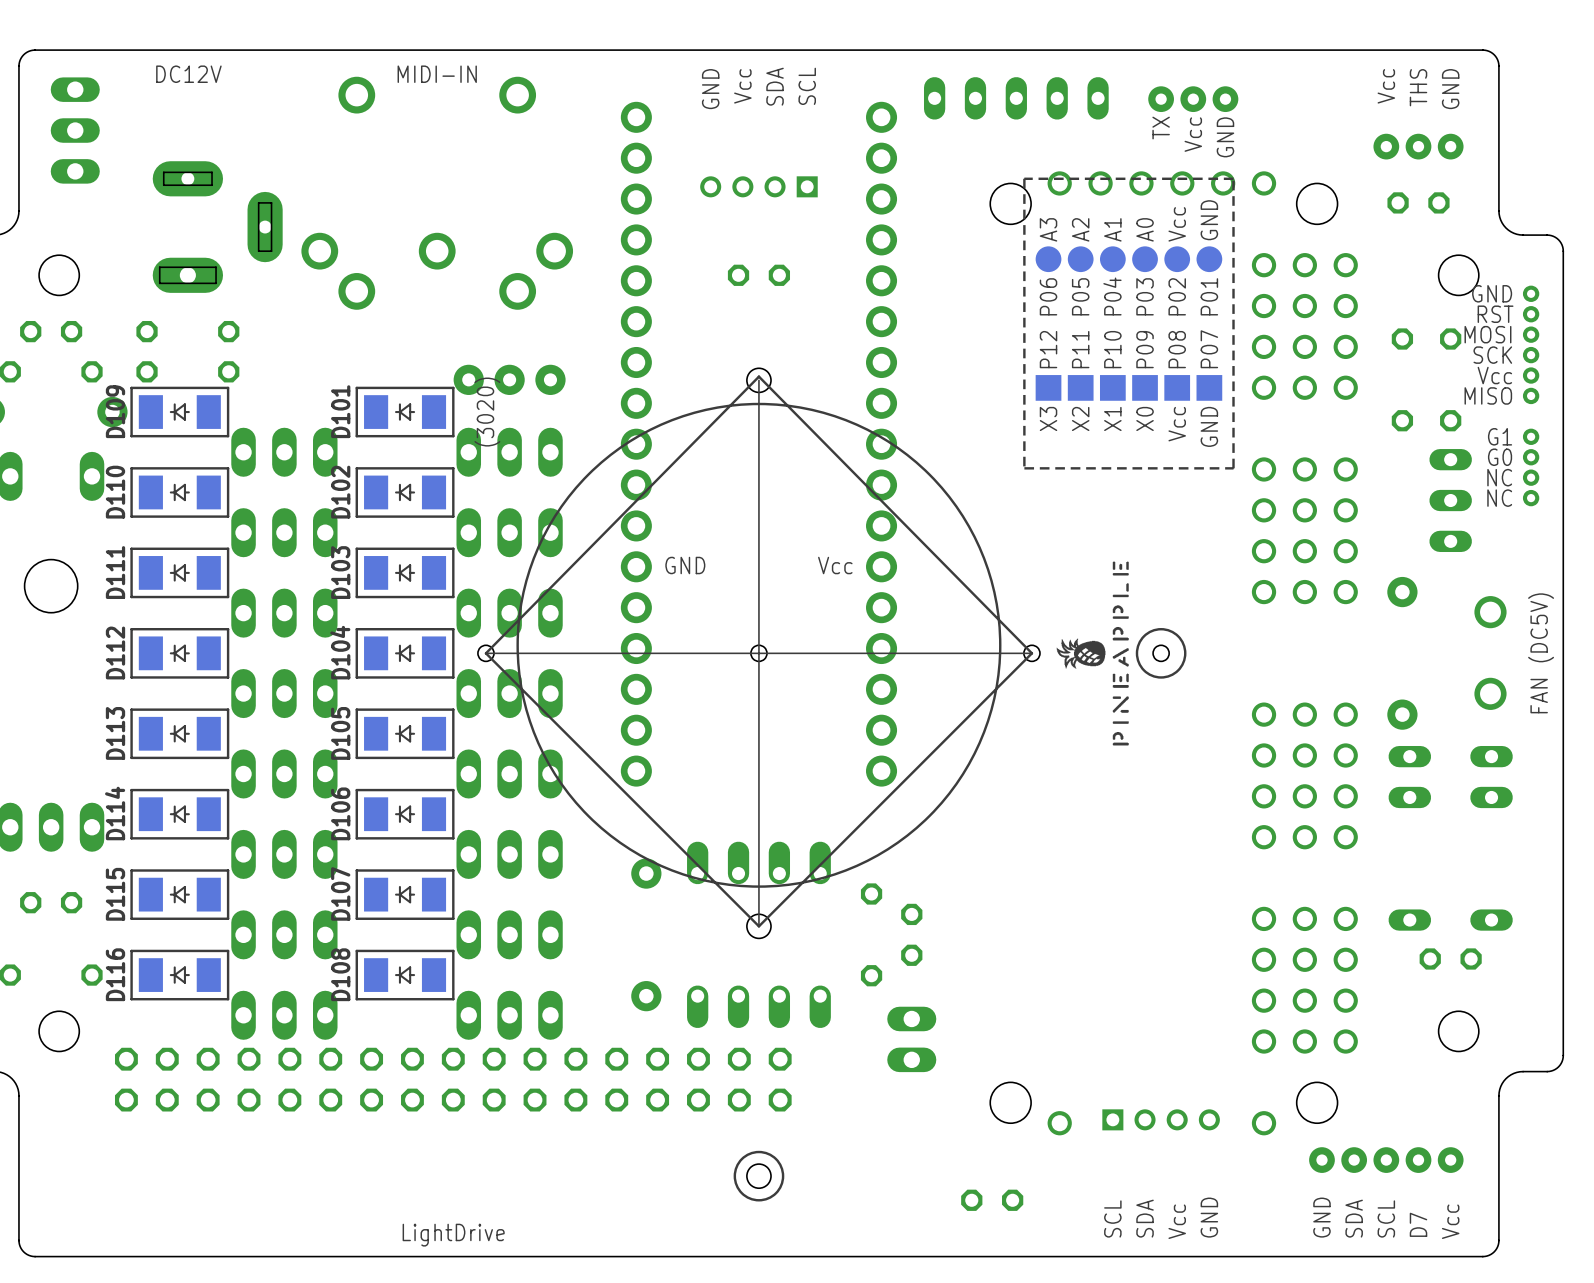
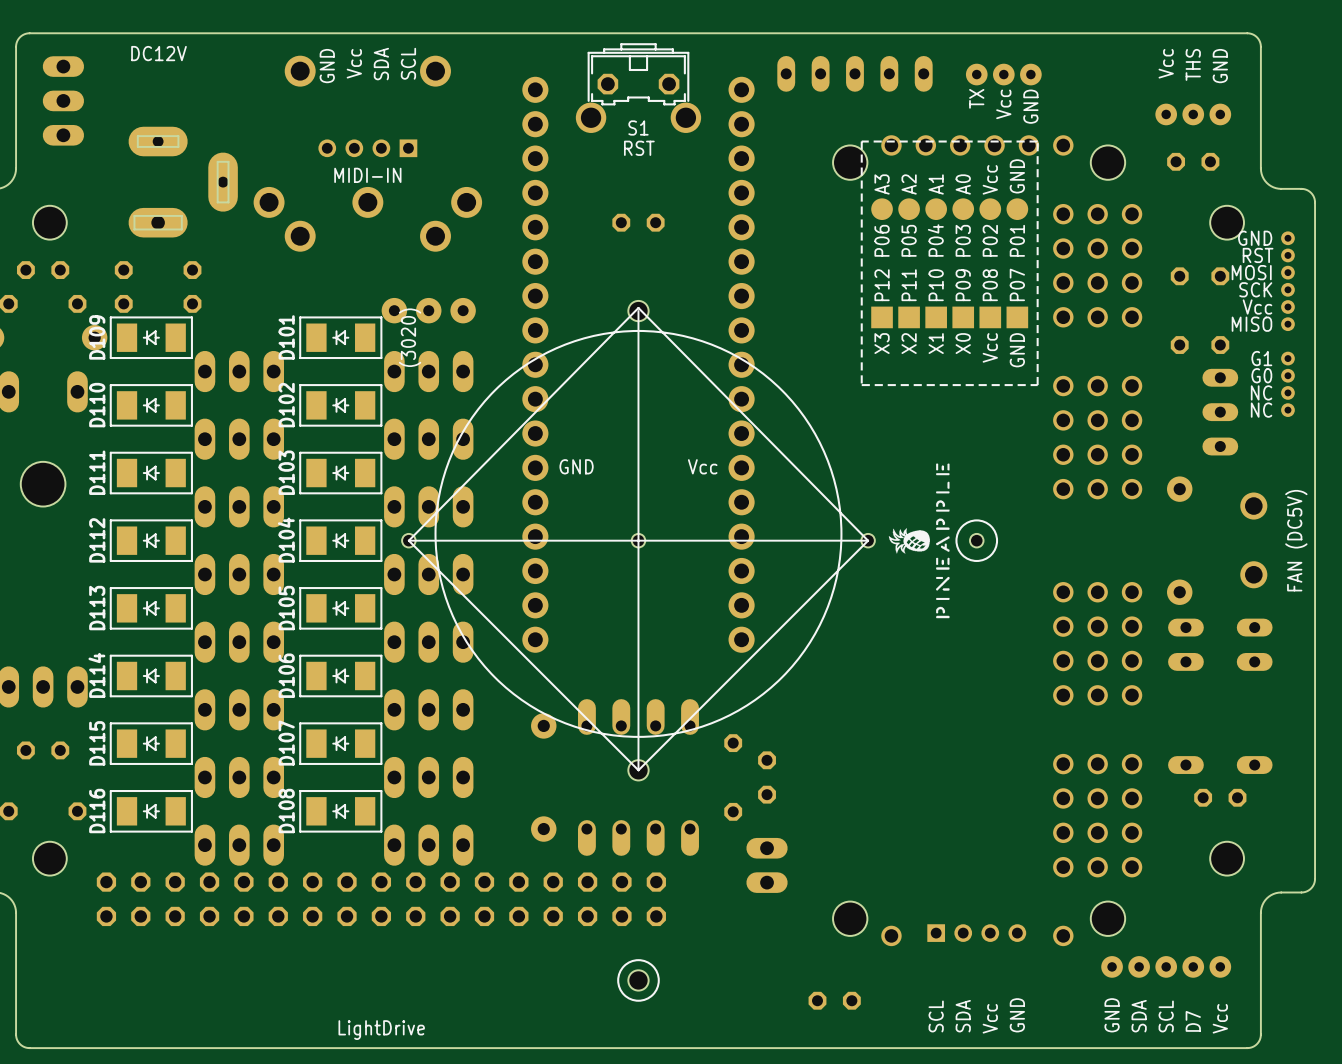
text position: MIDI-IN (437, 74) -> MIDI-IN (367, 175)
text position: Vcc (742, 86) -> Vcc (354, 63)
text position: SDA (775, 86) -> SDA (381, 64)
text position: SCL (807, 86) -> SCL (408, 63)
text position: GND (710, 89) -> GND (327, 66)
S1: none -> (638, 88)
part position: (758, 186) -> (367, 148)
text: none -> RST (639, 148)

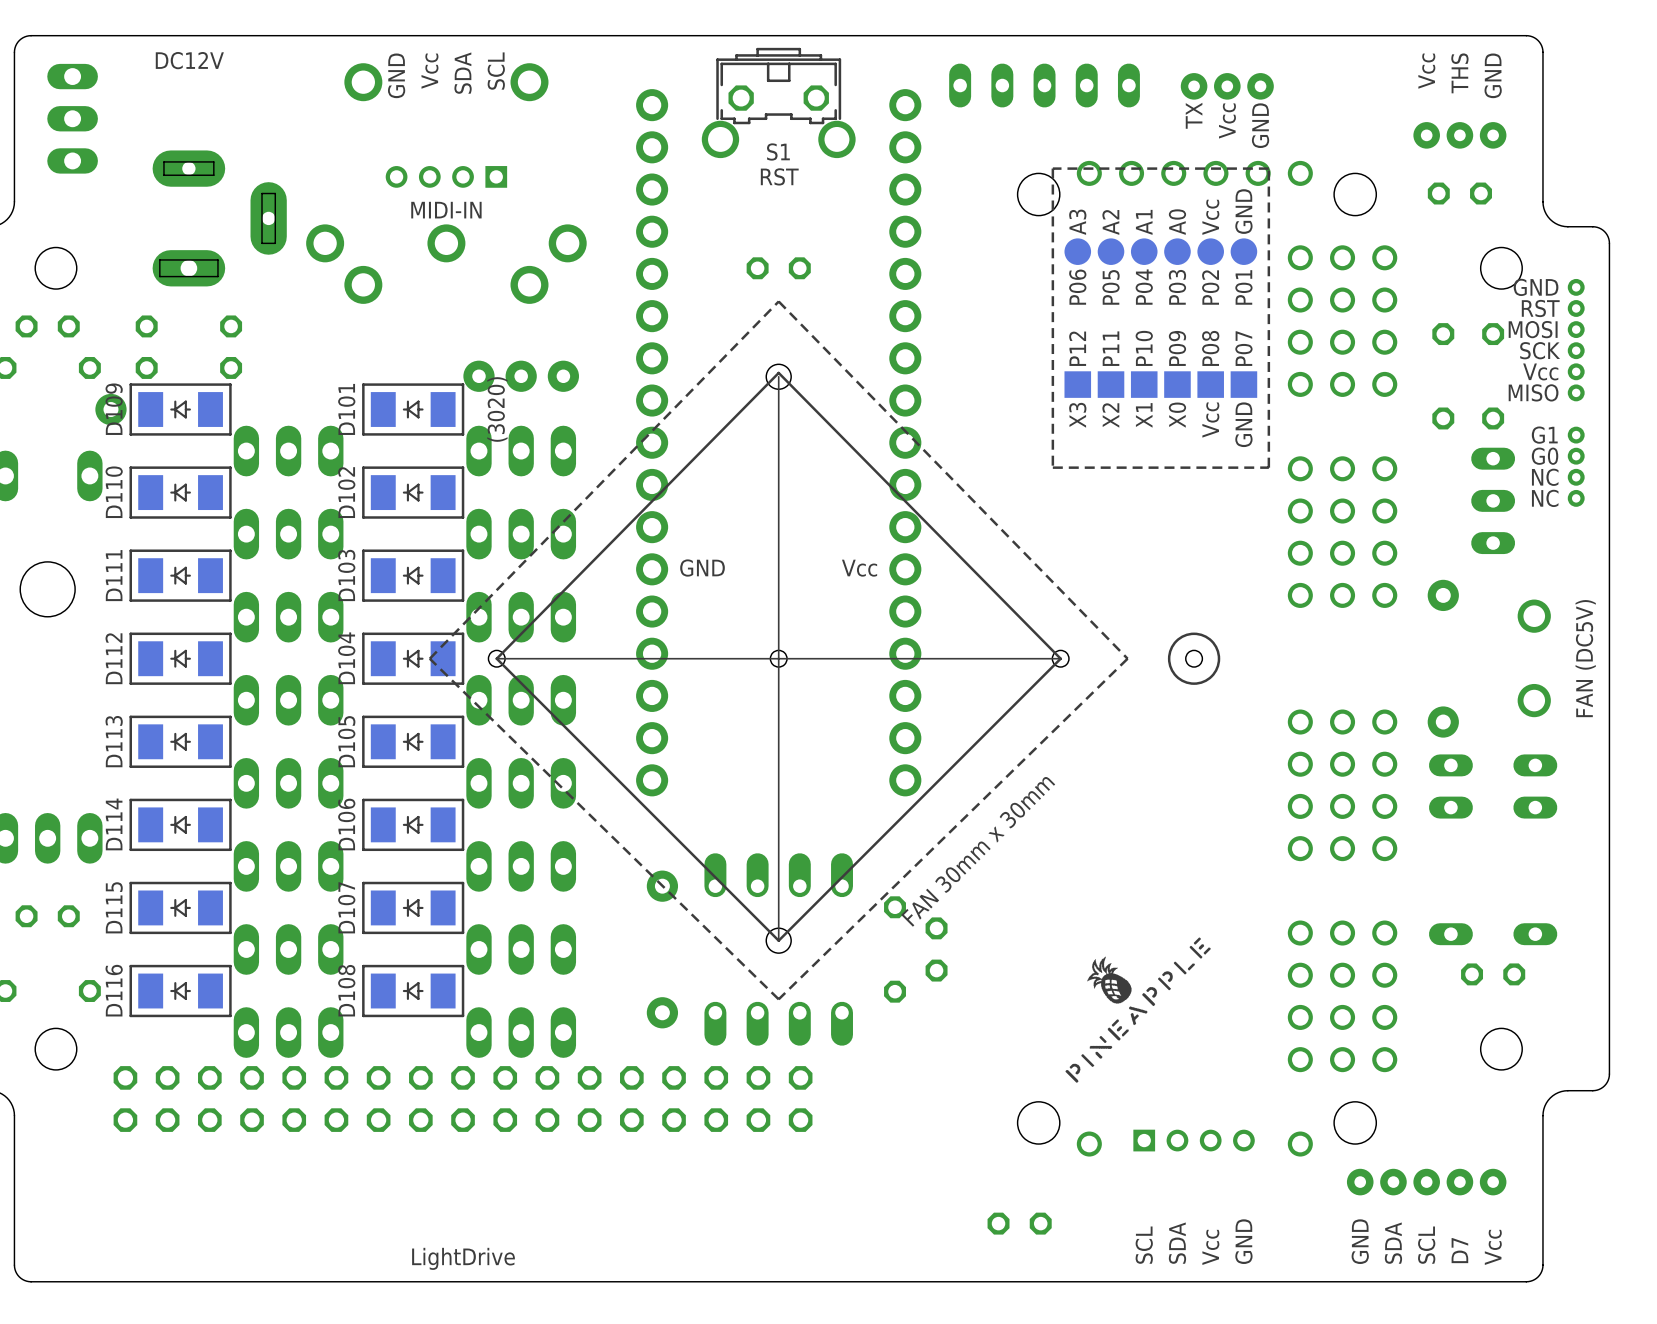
line: none -> (778, 301) (1127, 658) (778, 999) (429, 658) (778, 301)
drawing: [434, 329, 843, 738] -> none
drawing: [888, 463, 950, 619] -> none
text: none -> FAN 30mm x 30mm (978, 851)
drawing: none -> [1065, 937, 1211, 1083]
part: (767, 865) -> none
drawing: [617, 959, 660, 1002] -> none
hole: (638, 980) -> none

